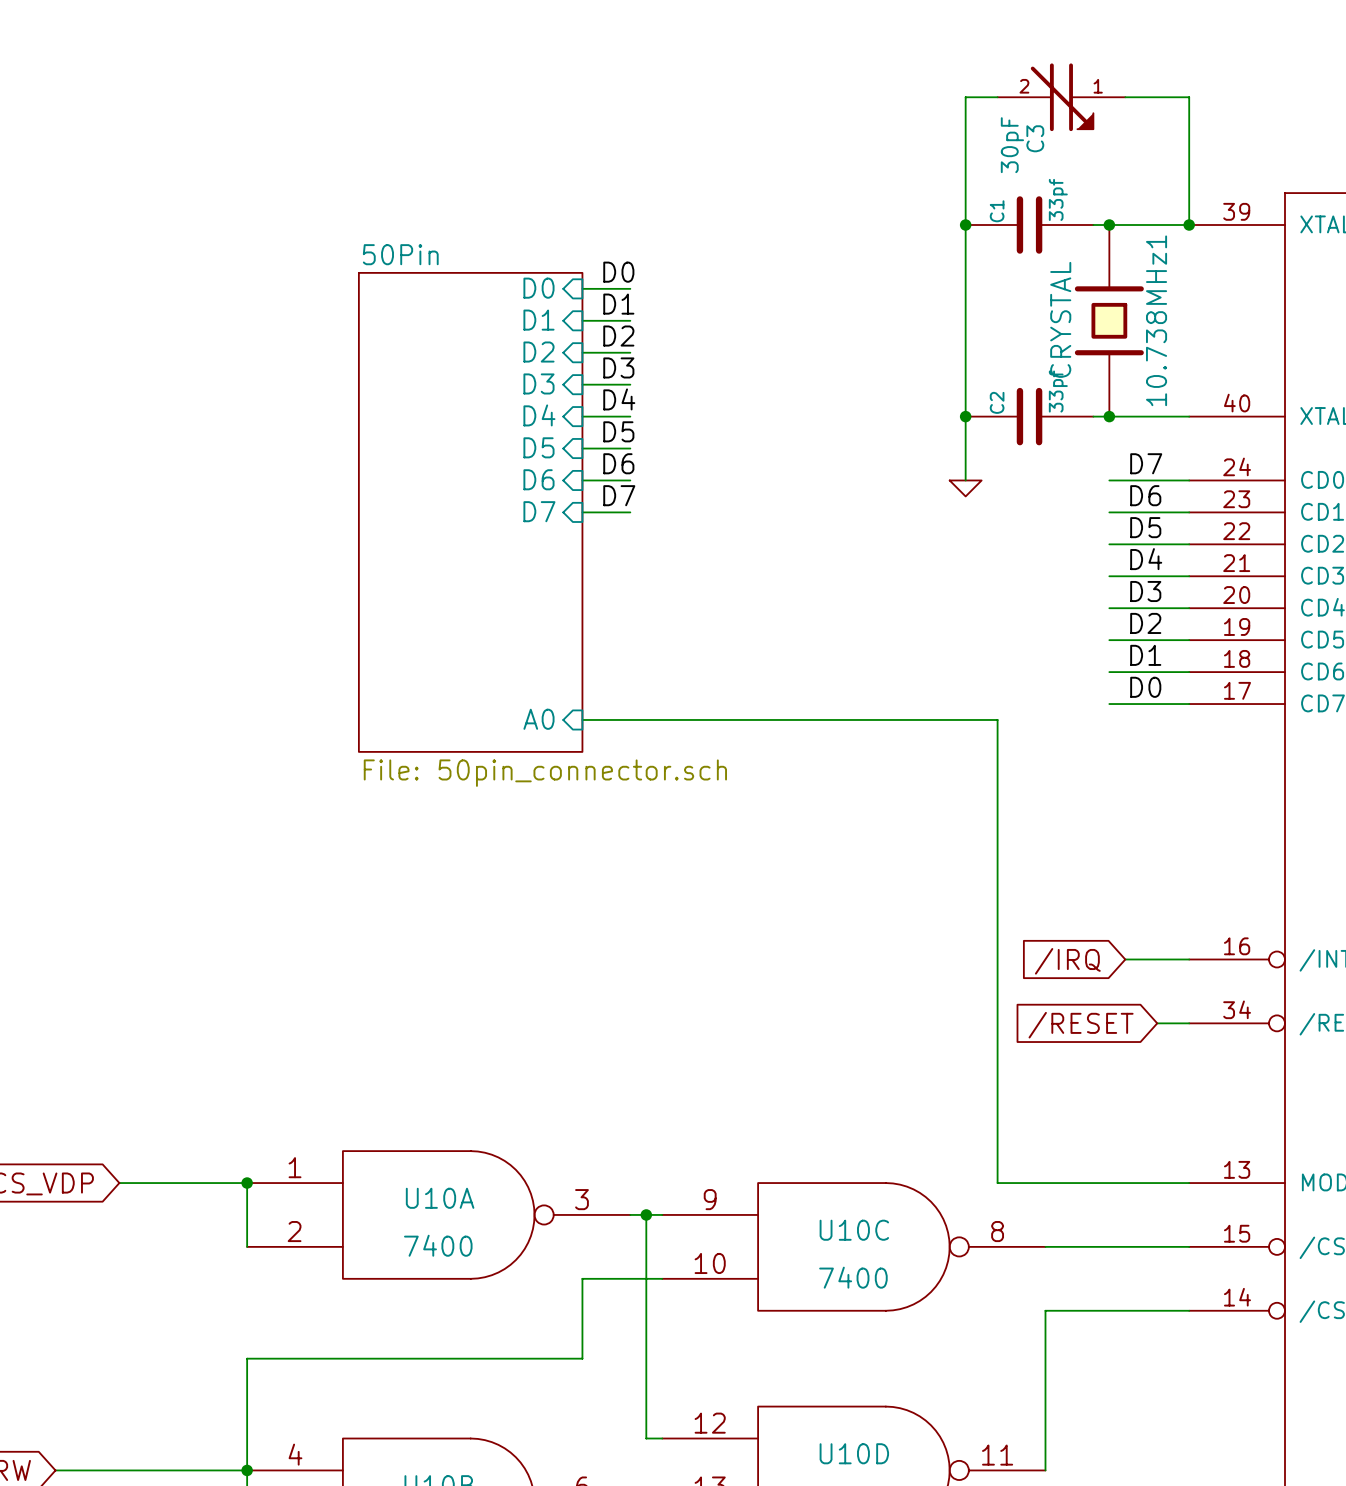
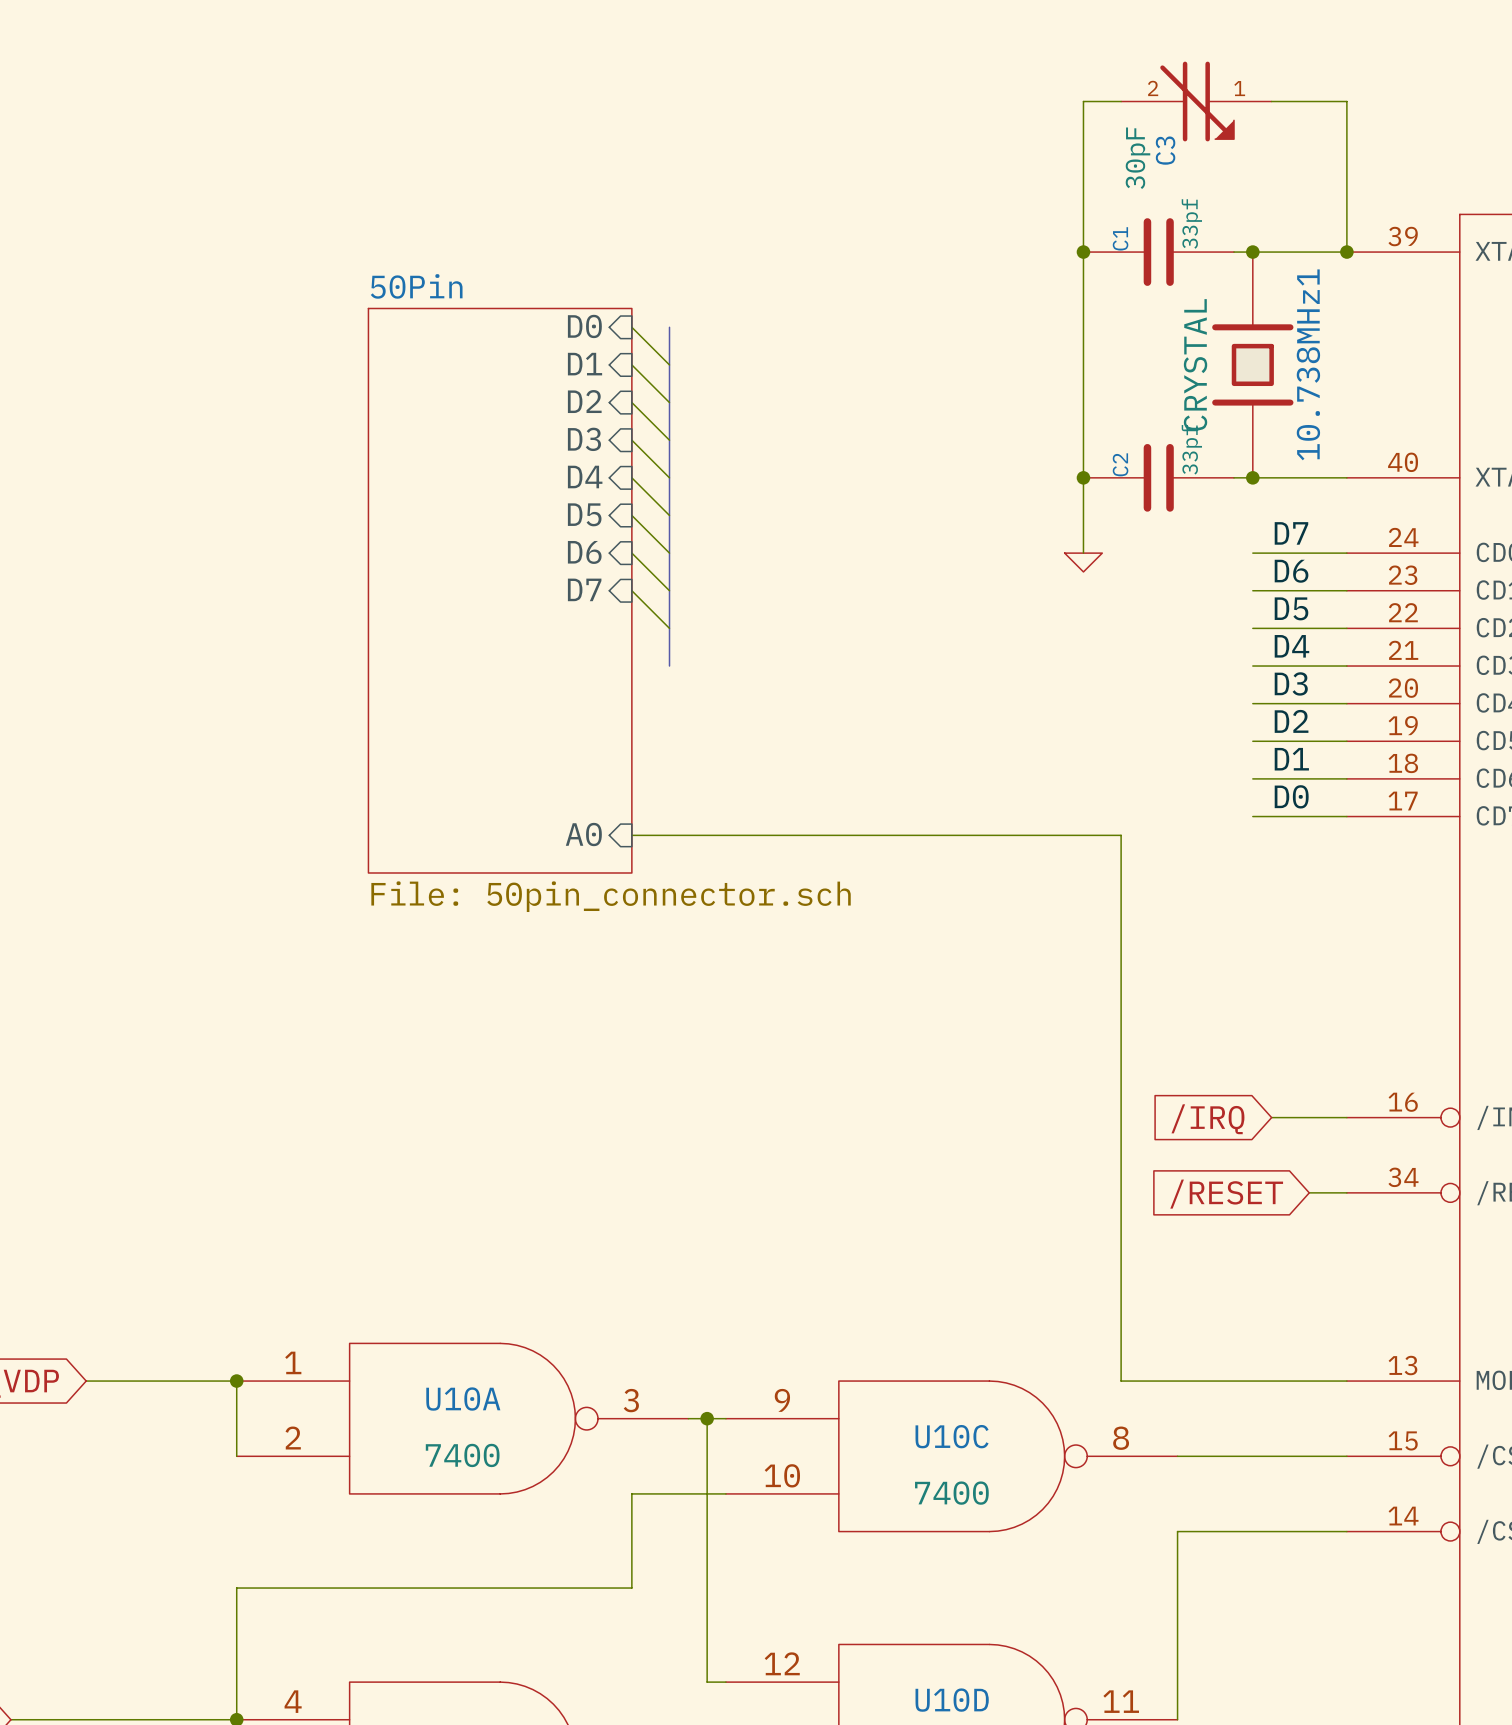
label: D0 (618, 272) -> none
wire: (582, 288) (630, 288) -> (631, 327) (669, 364)
bus: none -> (669, 327) (669, 666)
label: D1 (618, 304) -> none
wire: (582, 320) (630, 320) -> (631, 364) (669, 402)
label: D2 (618, 336) -> none
wire: (582, 352) (630, 352) -> (631, 402) (669, 440)
label: D3 (618, 367) -> none
wire: (582, 384) (630, 384) -> (631, 440) (669, 477)
label: D4 (619, 399) -> none
wire: (582, 416) (630, 416) -> (631, 477) (669, 515)
label: D5 (618, 431) -> none
wire: (582, 448) (630, 448) -> (631, 515) (669, 553)
label: D6 (618, 463) -> none
wire: (582, 480) (630, 480) -> (631, 553) (669, 590)
label: D7 (619, 495) -> none
wire: (582, 512) (630, 512) -> (631, 590) (669, 628)

